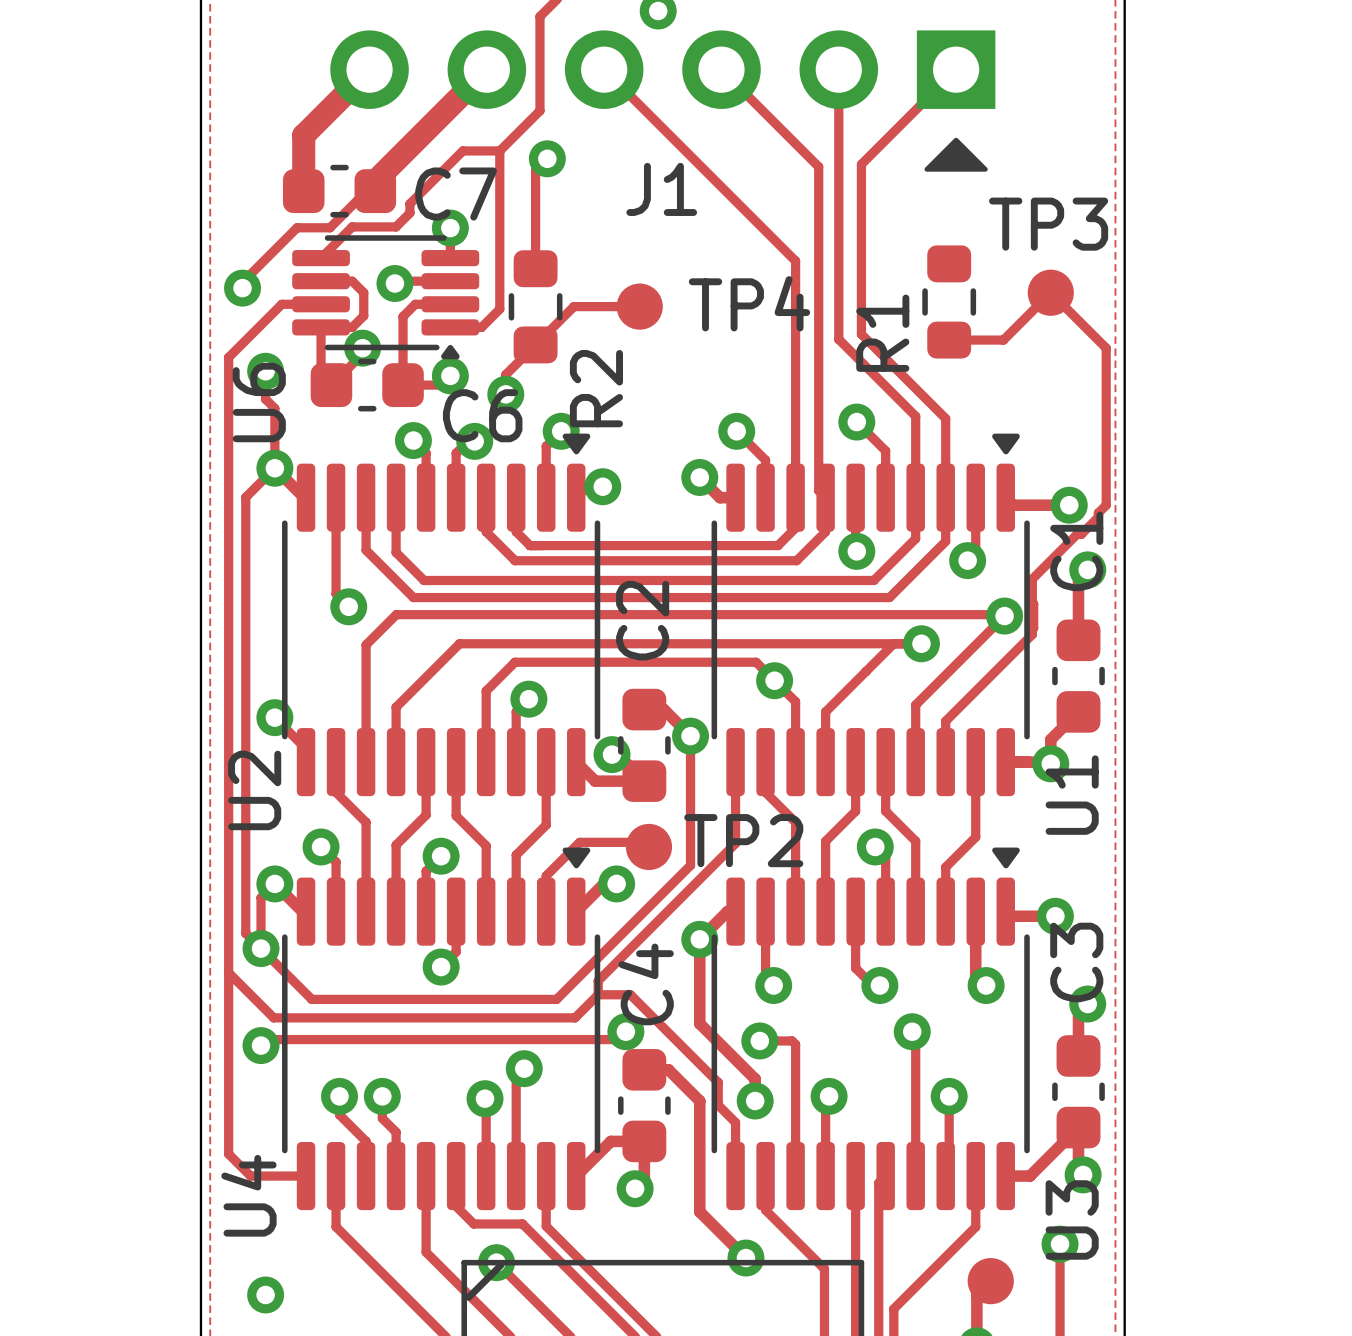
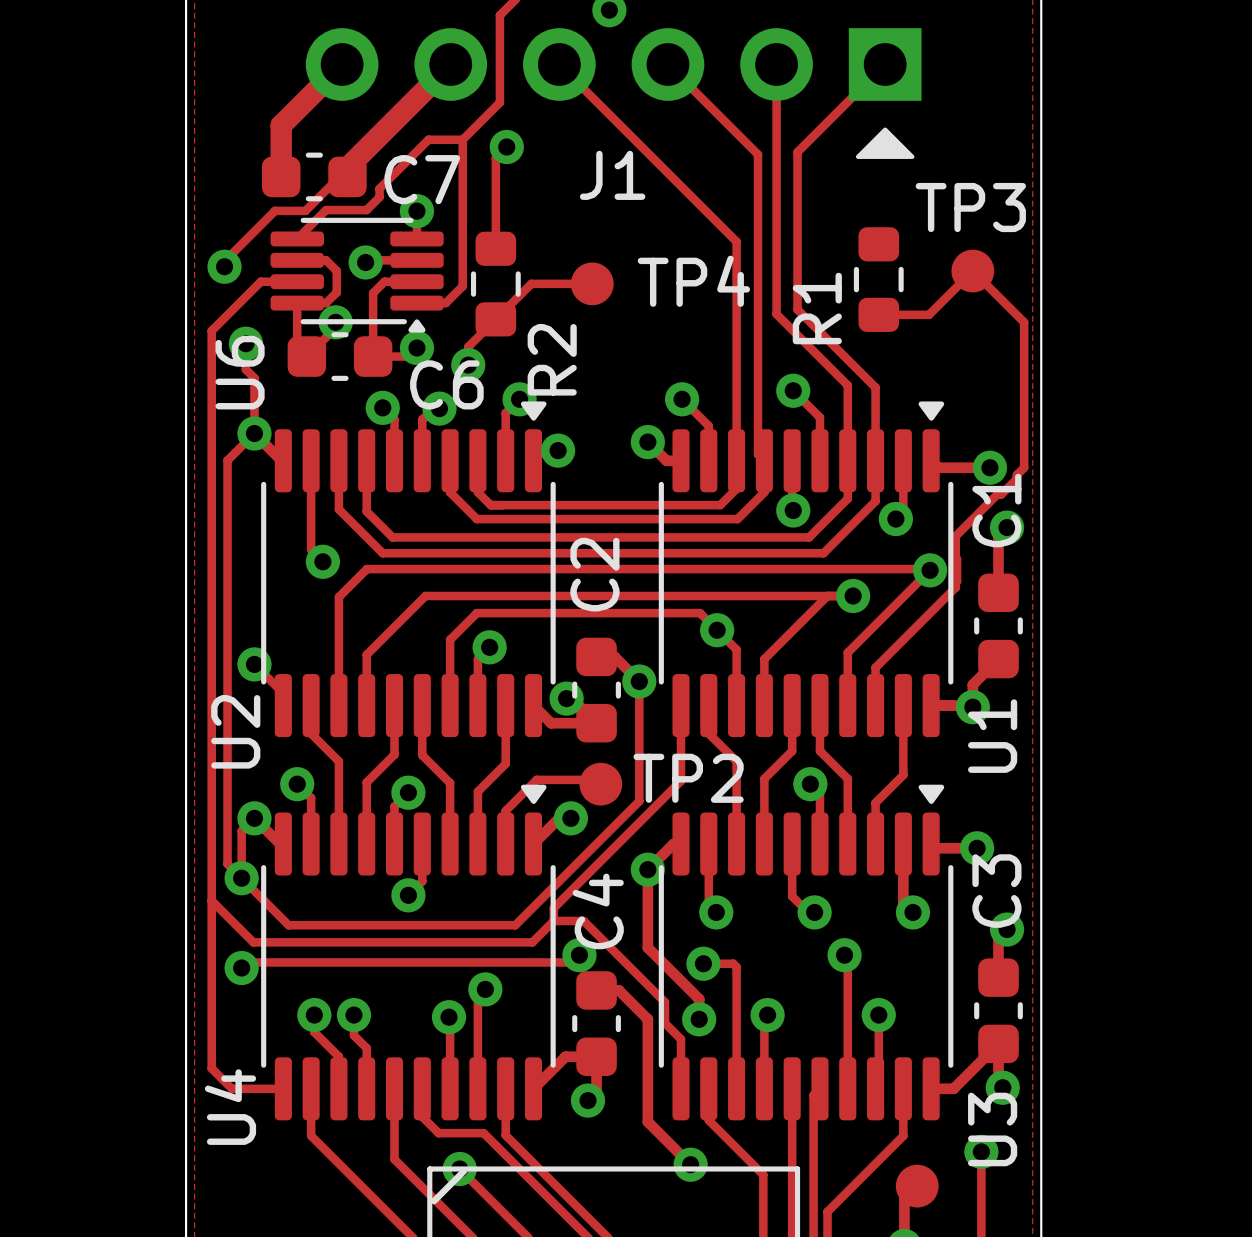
via: (265, 1294) -> none

